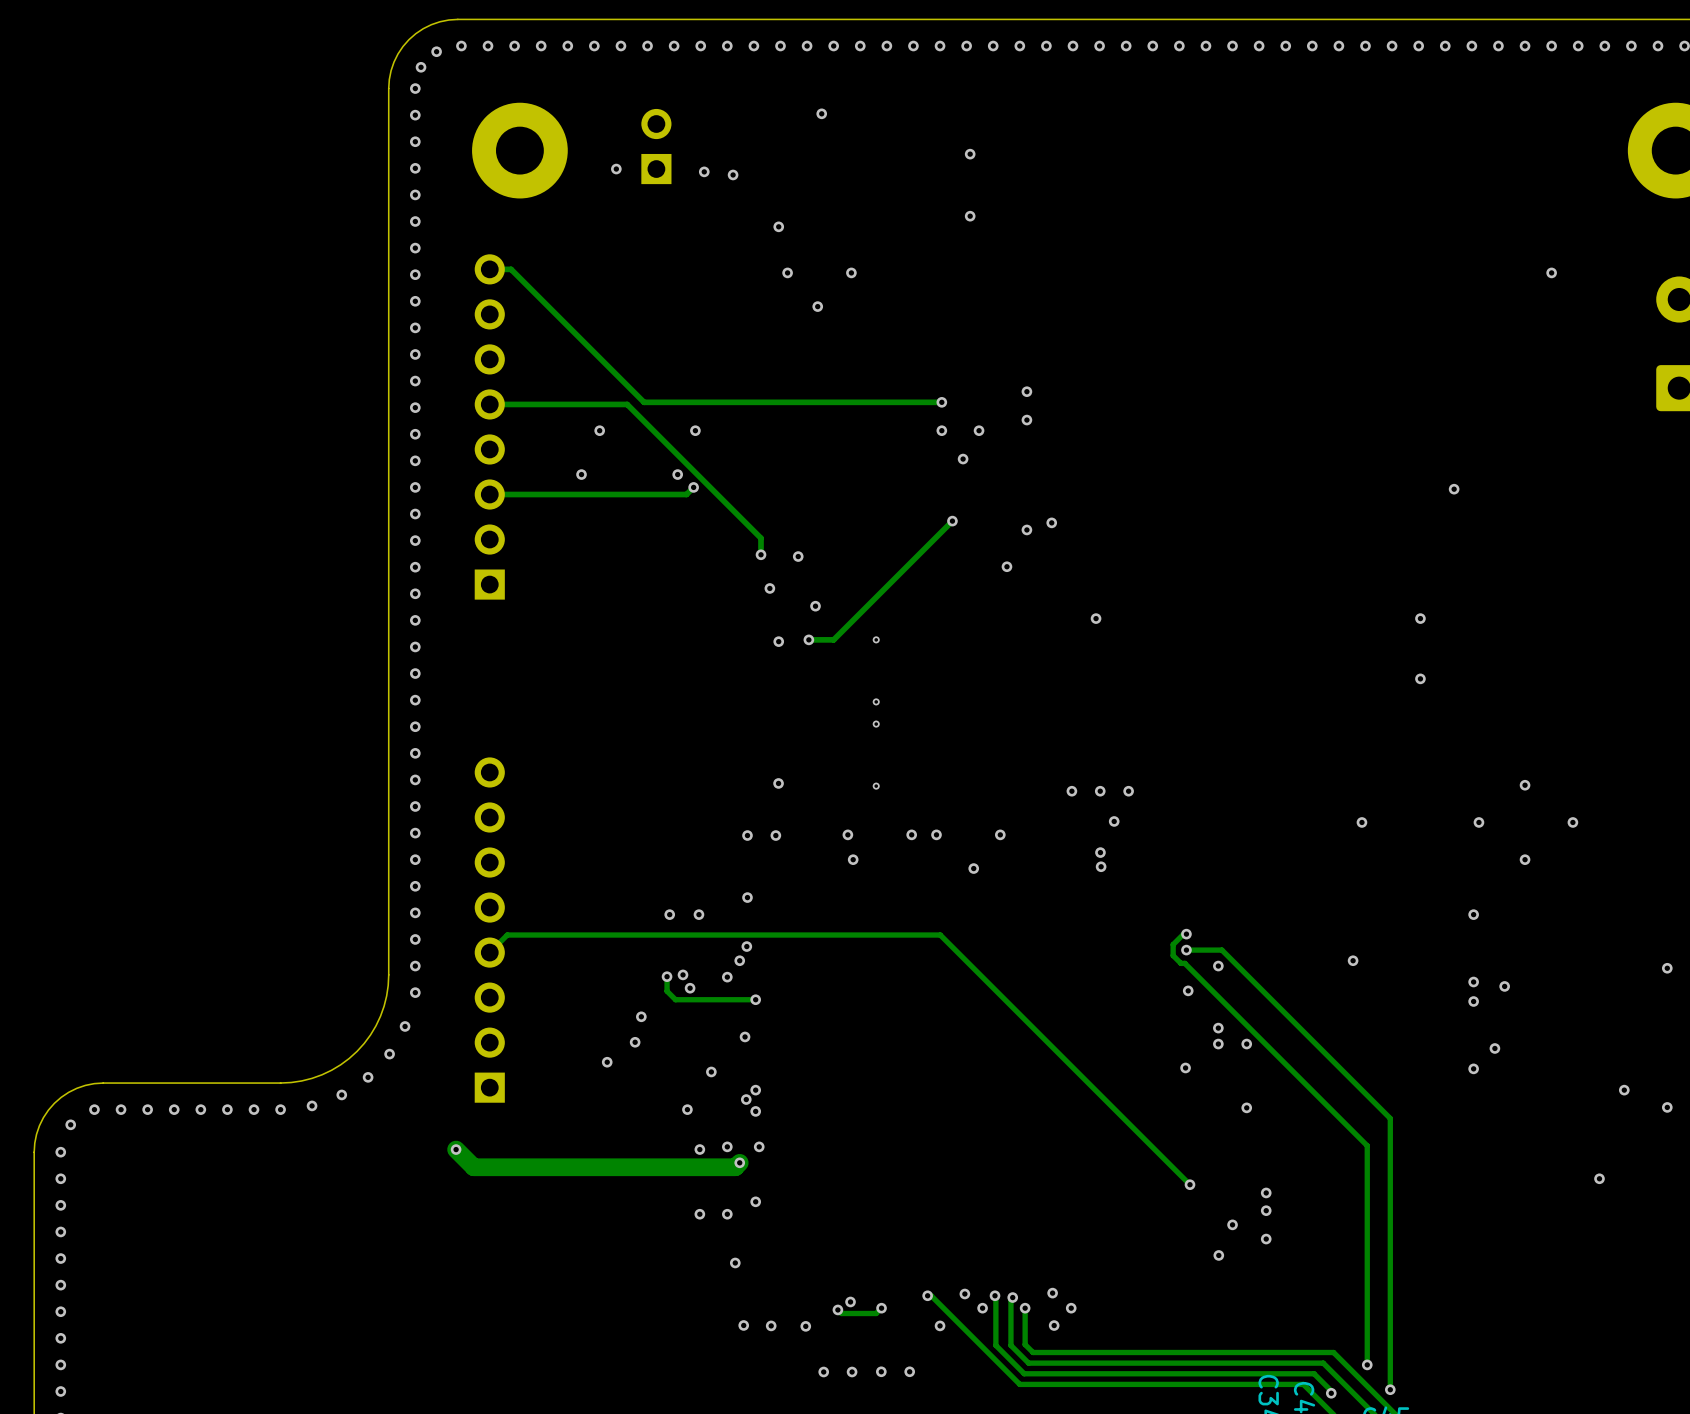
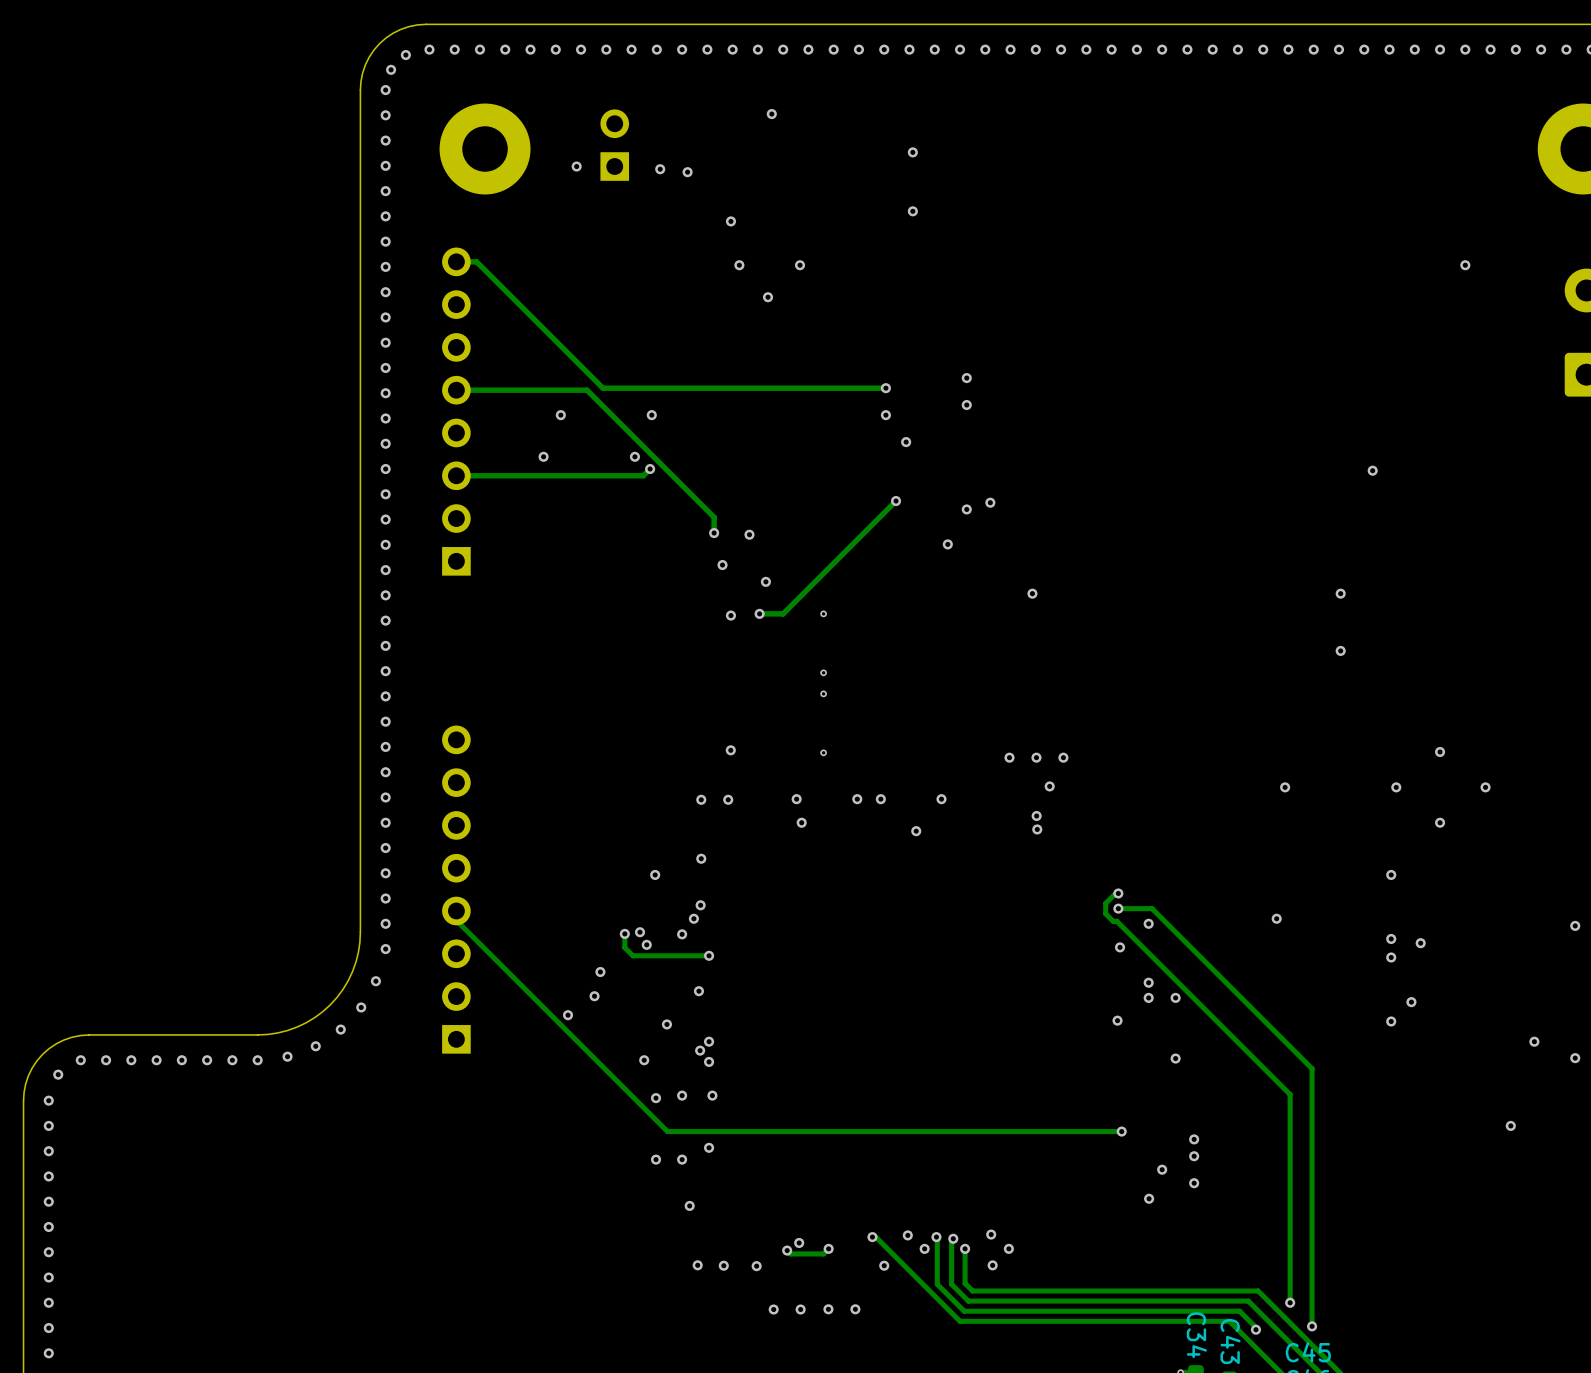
via: (979, 430) -> none
via: (669, 914) -> none
track: (489, 952) (507, 935) (940, 935) (1190, 1184) -> (456, 911) (456, 920) (667, 1131) (1121, 1131)
track: (456, 1149) (473, 1167) (735, 1167) (739, 1162) -> none
via: (456, 1149) -> none
via: (739, 1162) -> none

